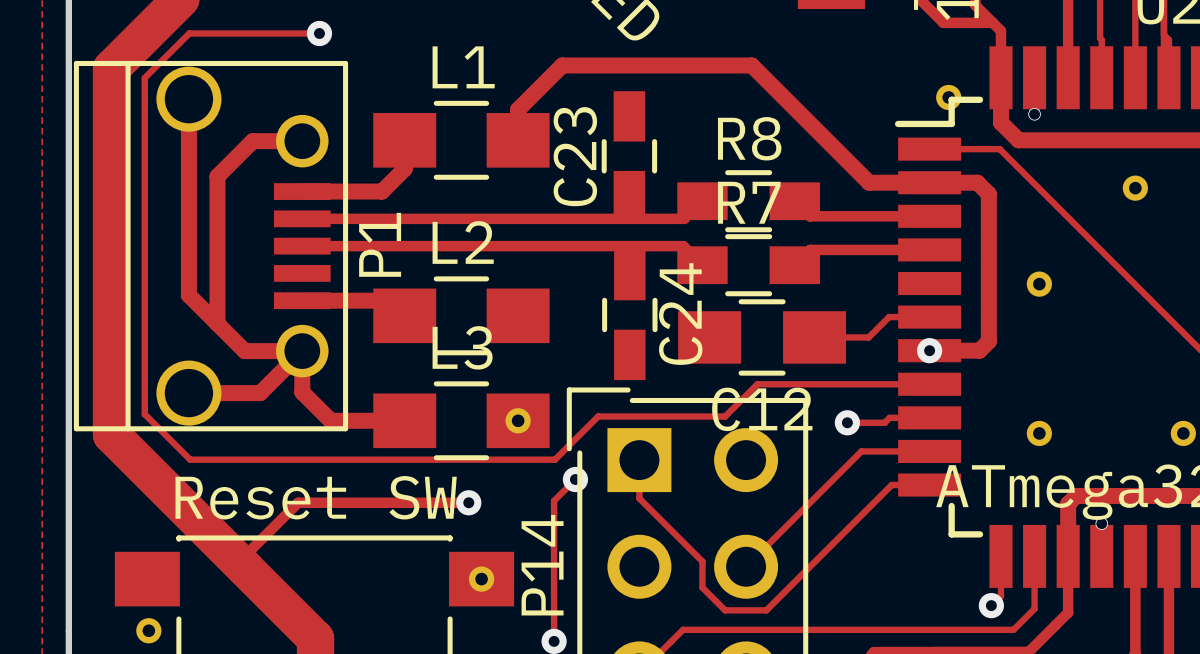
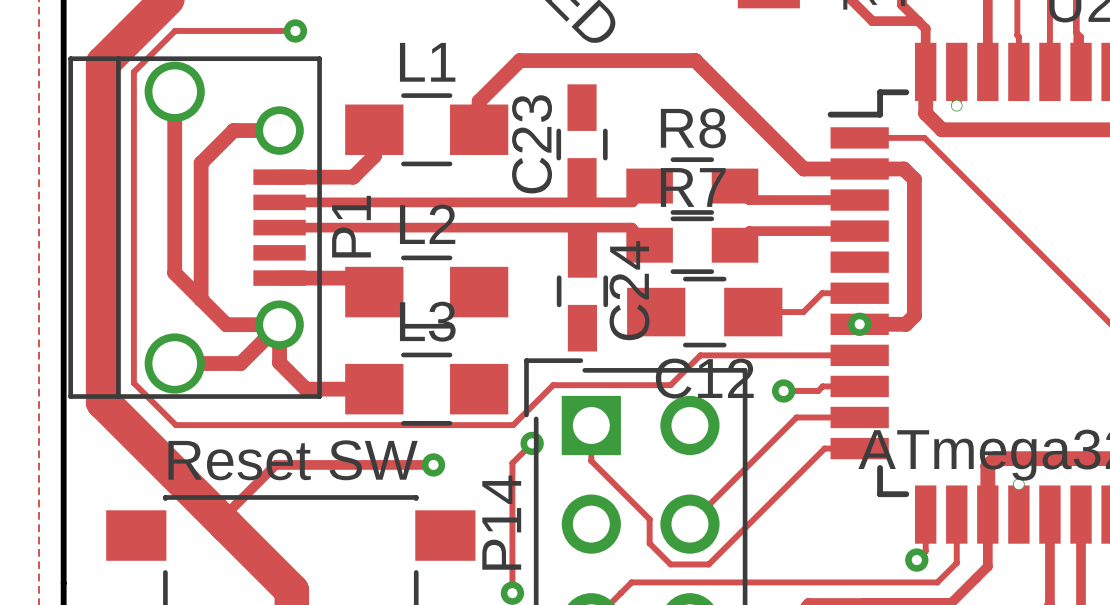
part: (948, 97) -> none
part: (1135, 188) -> none
part: (1039, 284) -> none
part: (518, 420) -> none
part: (1039, 433) -> none
part: (1183, 433) -> none
part: (481, 579) -> none
part: (148, 630) -> none

